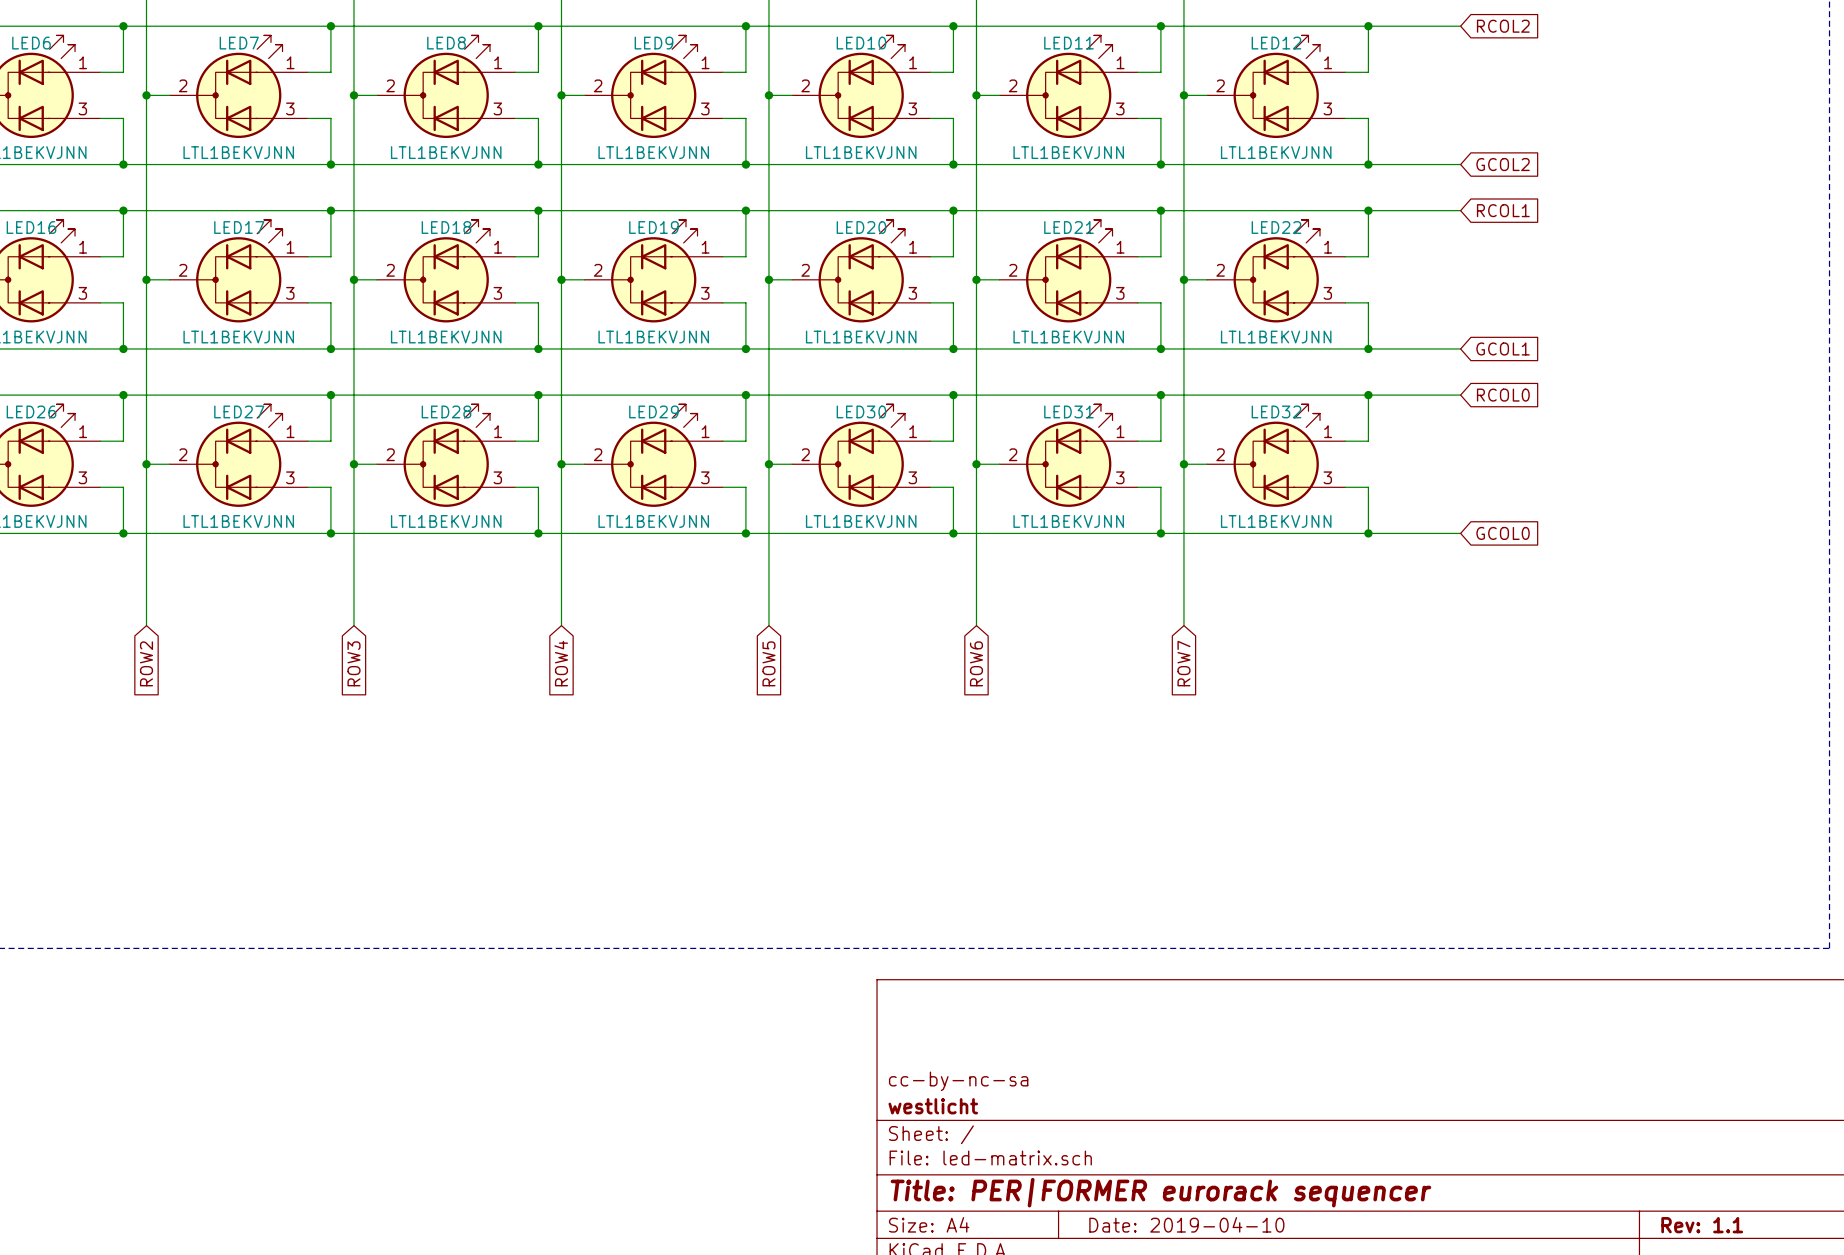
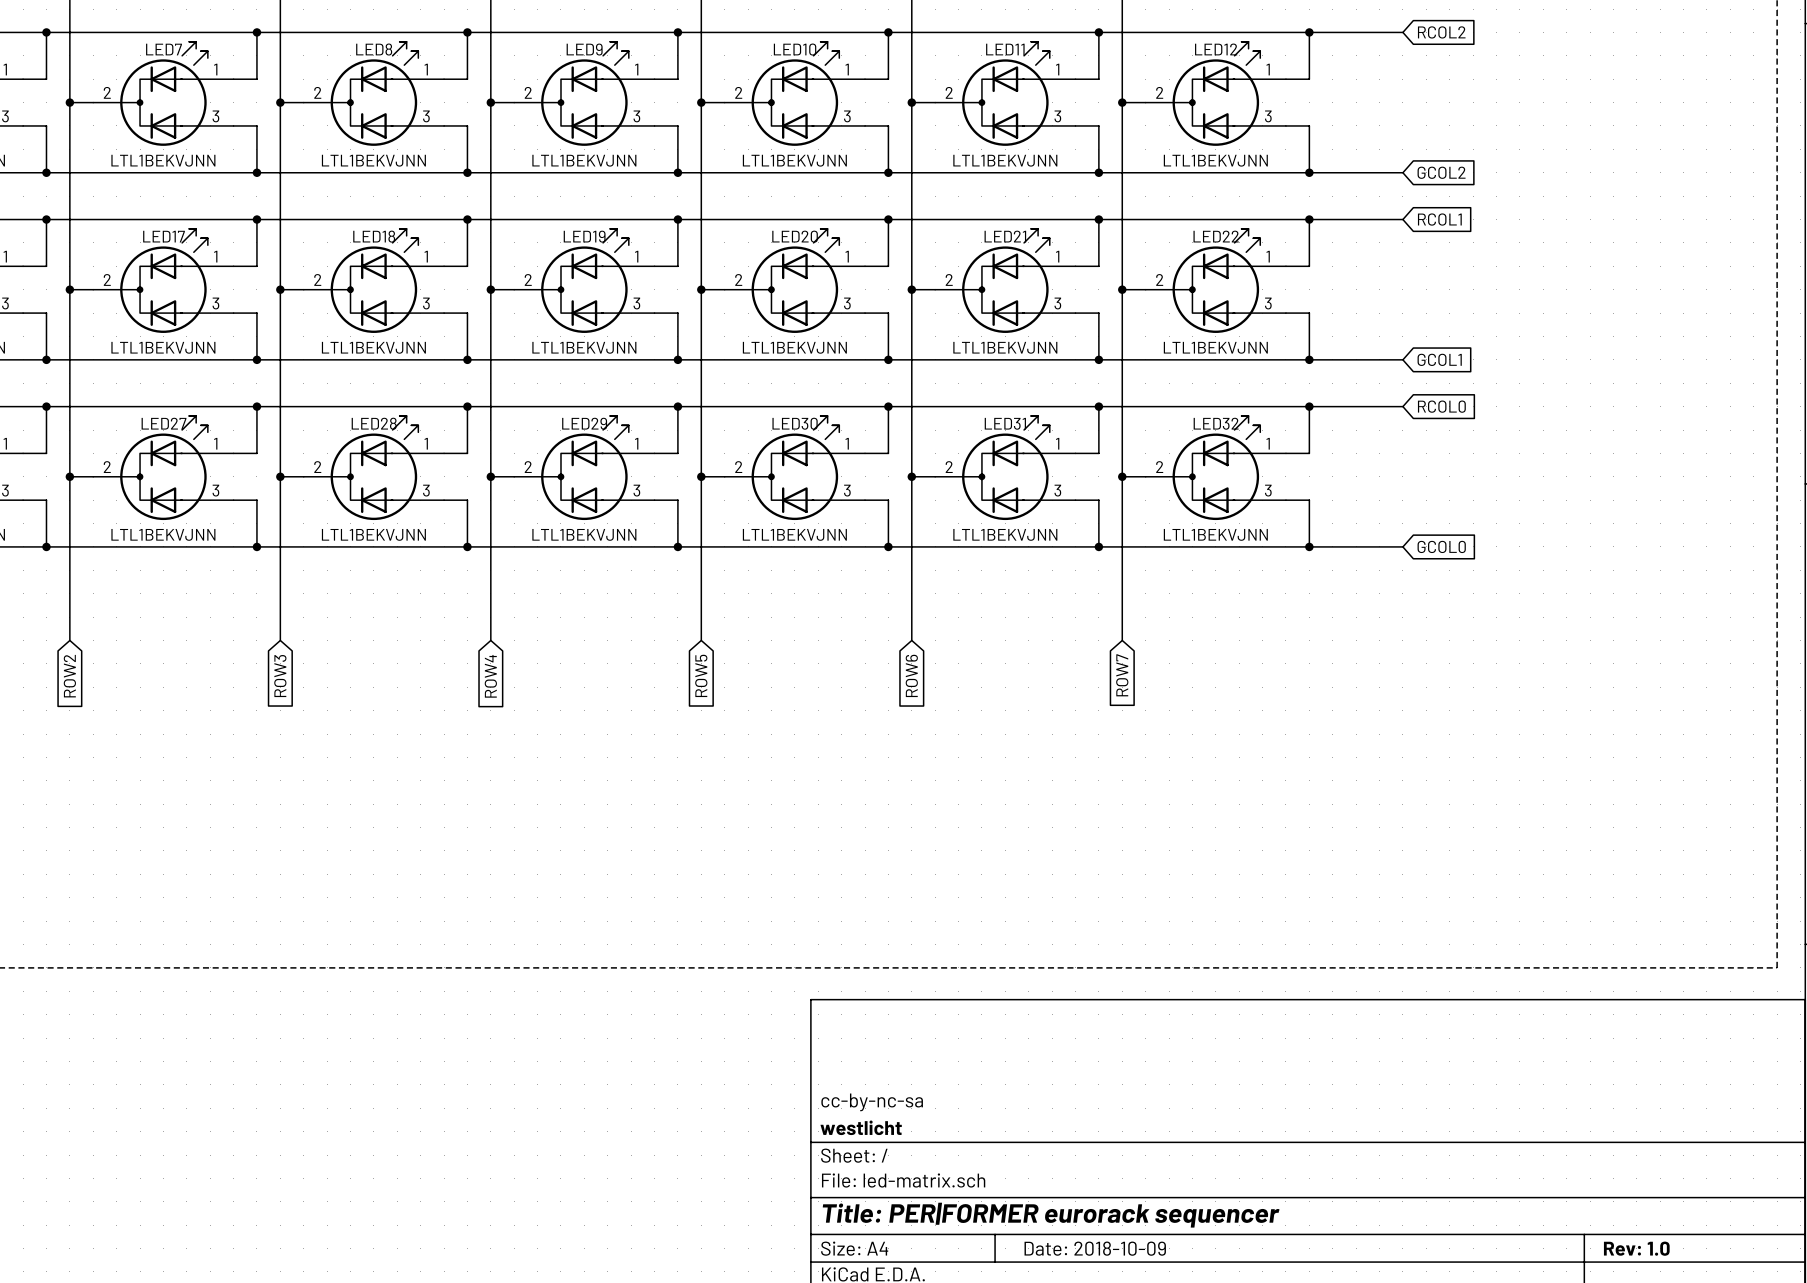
title block: Date: 2019-04-10 (1186, 1224) -> Date: 2018-10-09 (1095, 1248)
title block: Rev: 1.1 (1702, 1225) -> Rev: 1.0 (1636, 1248)

